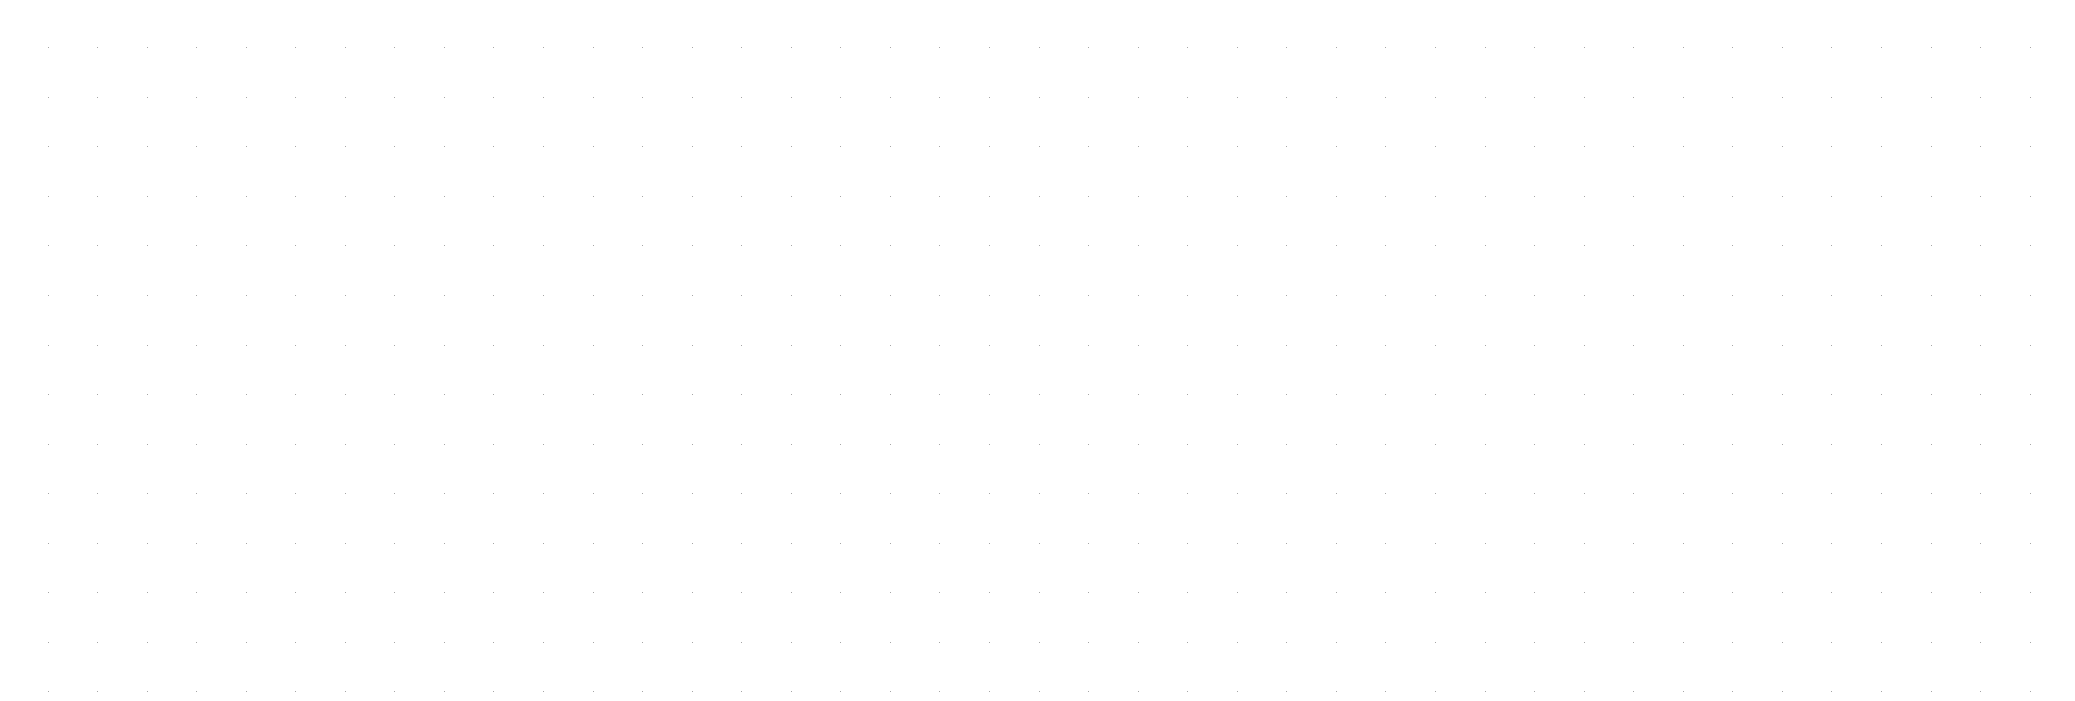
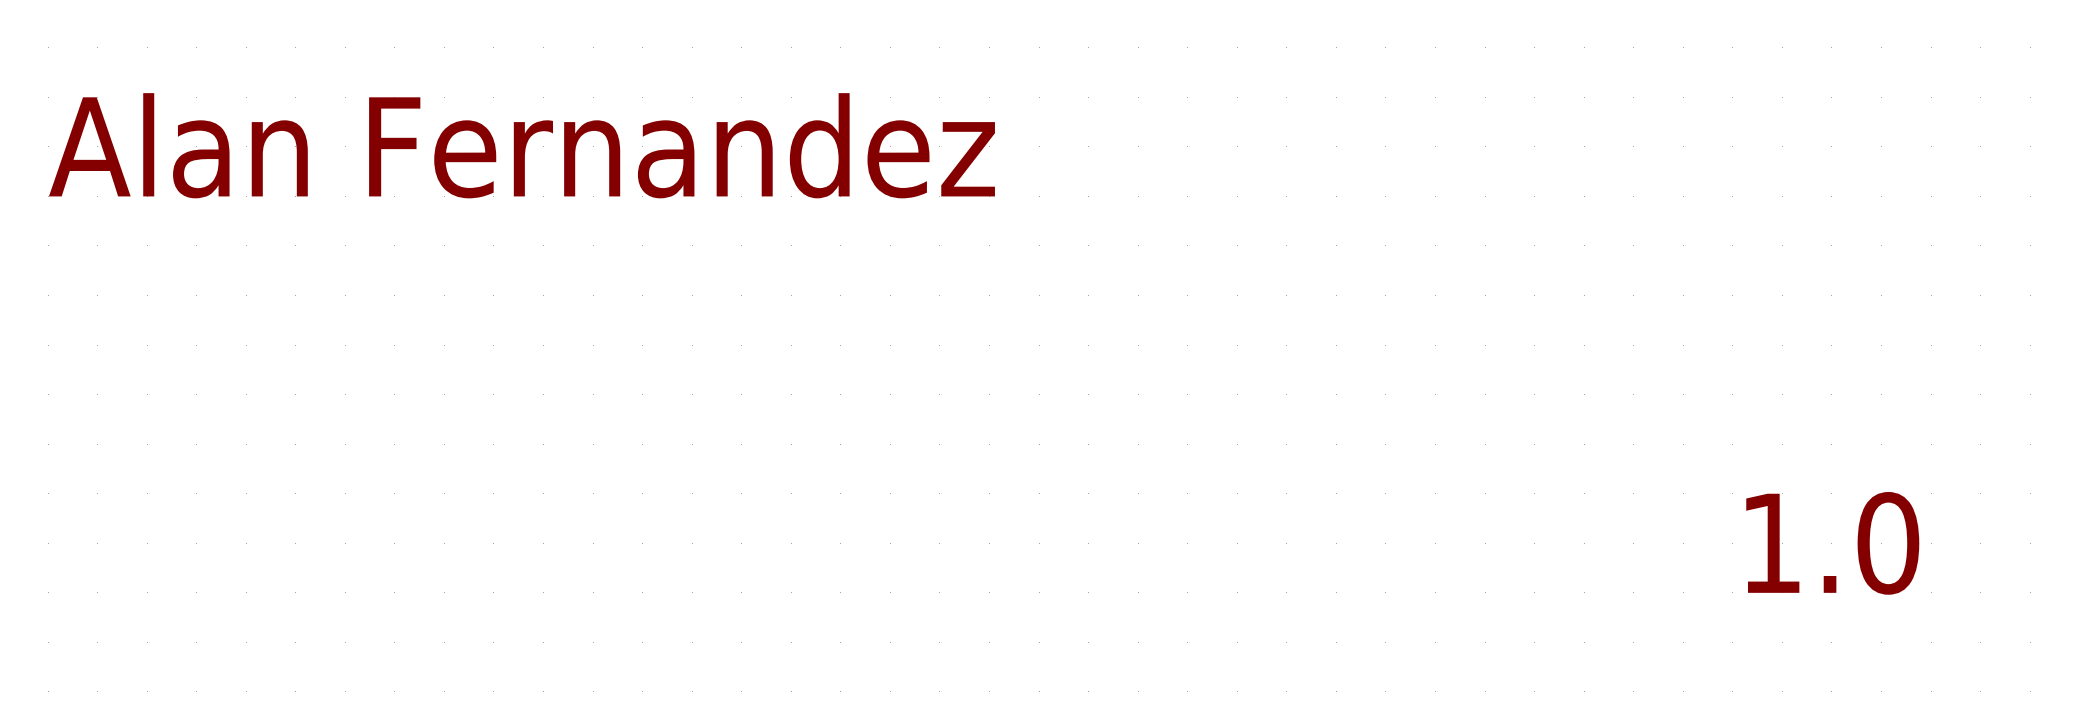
text: none -> Alan Fernandez (521, 145)
text: none -> 1.0 (1832, 543)

